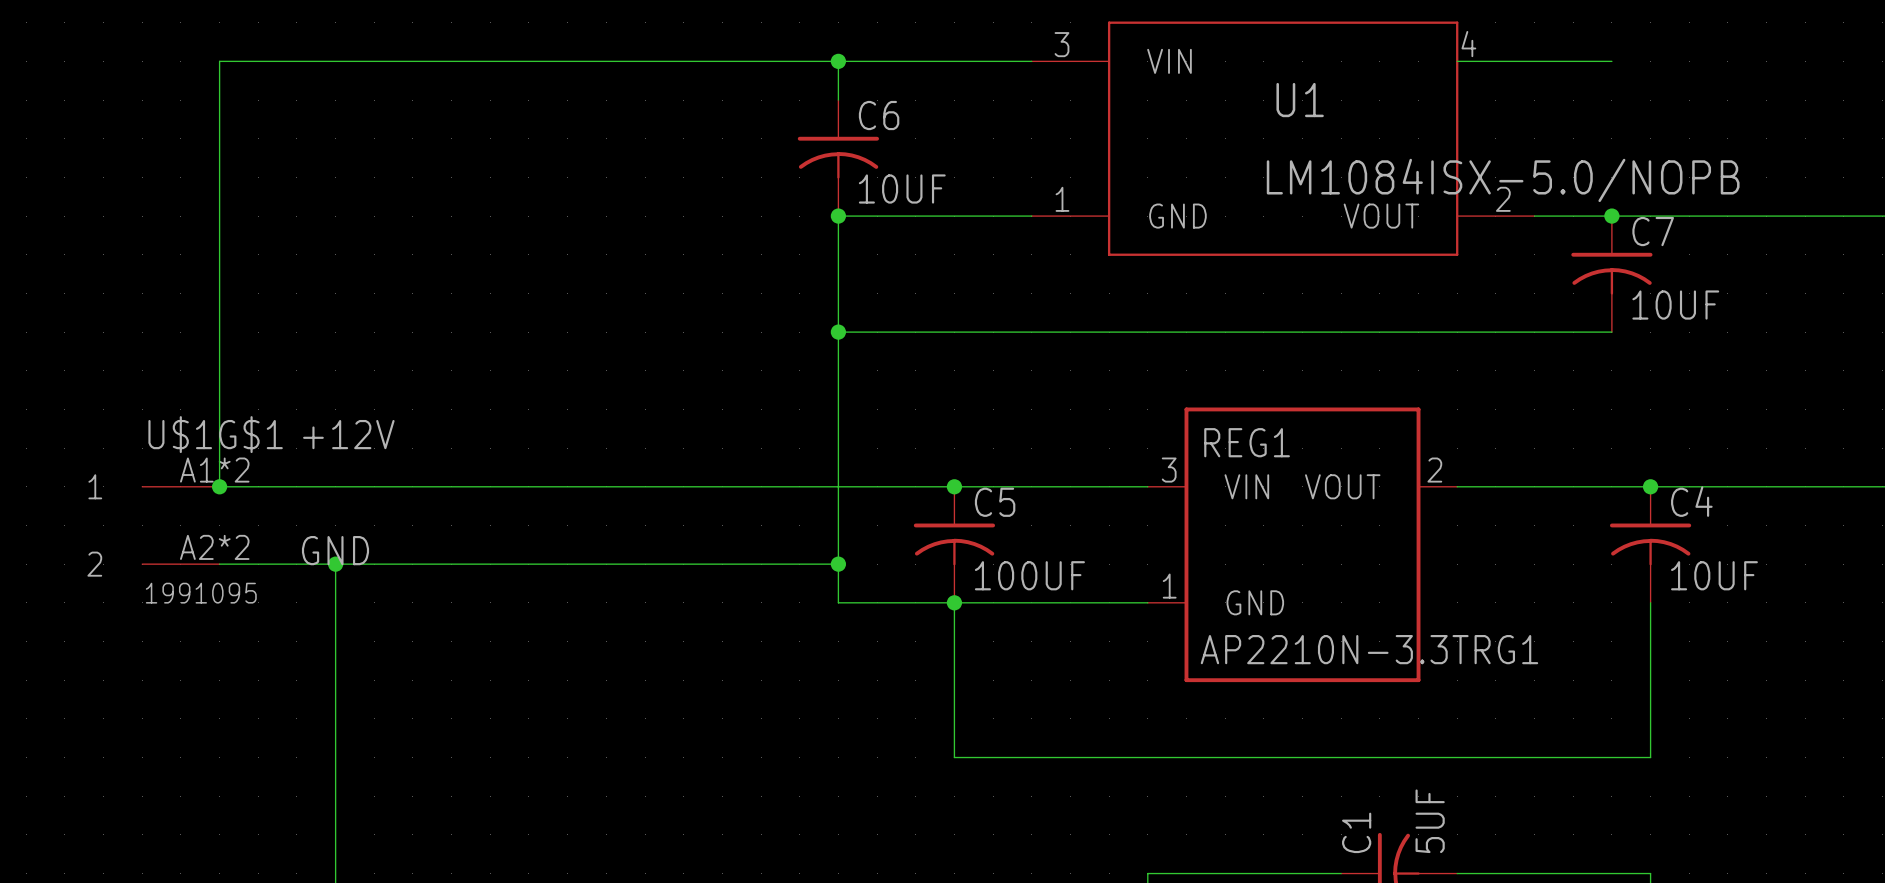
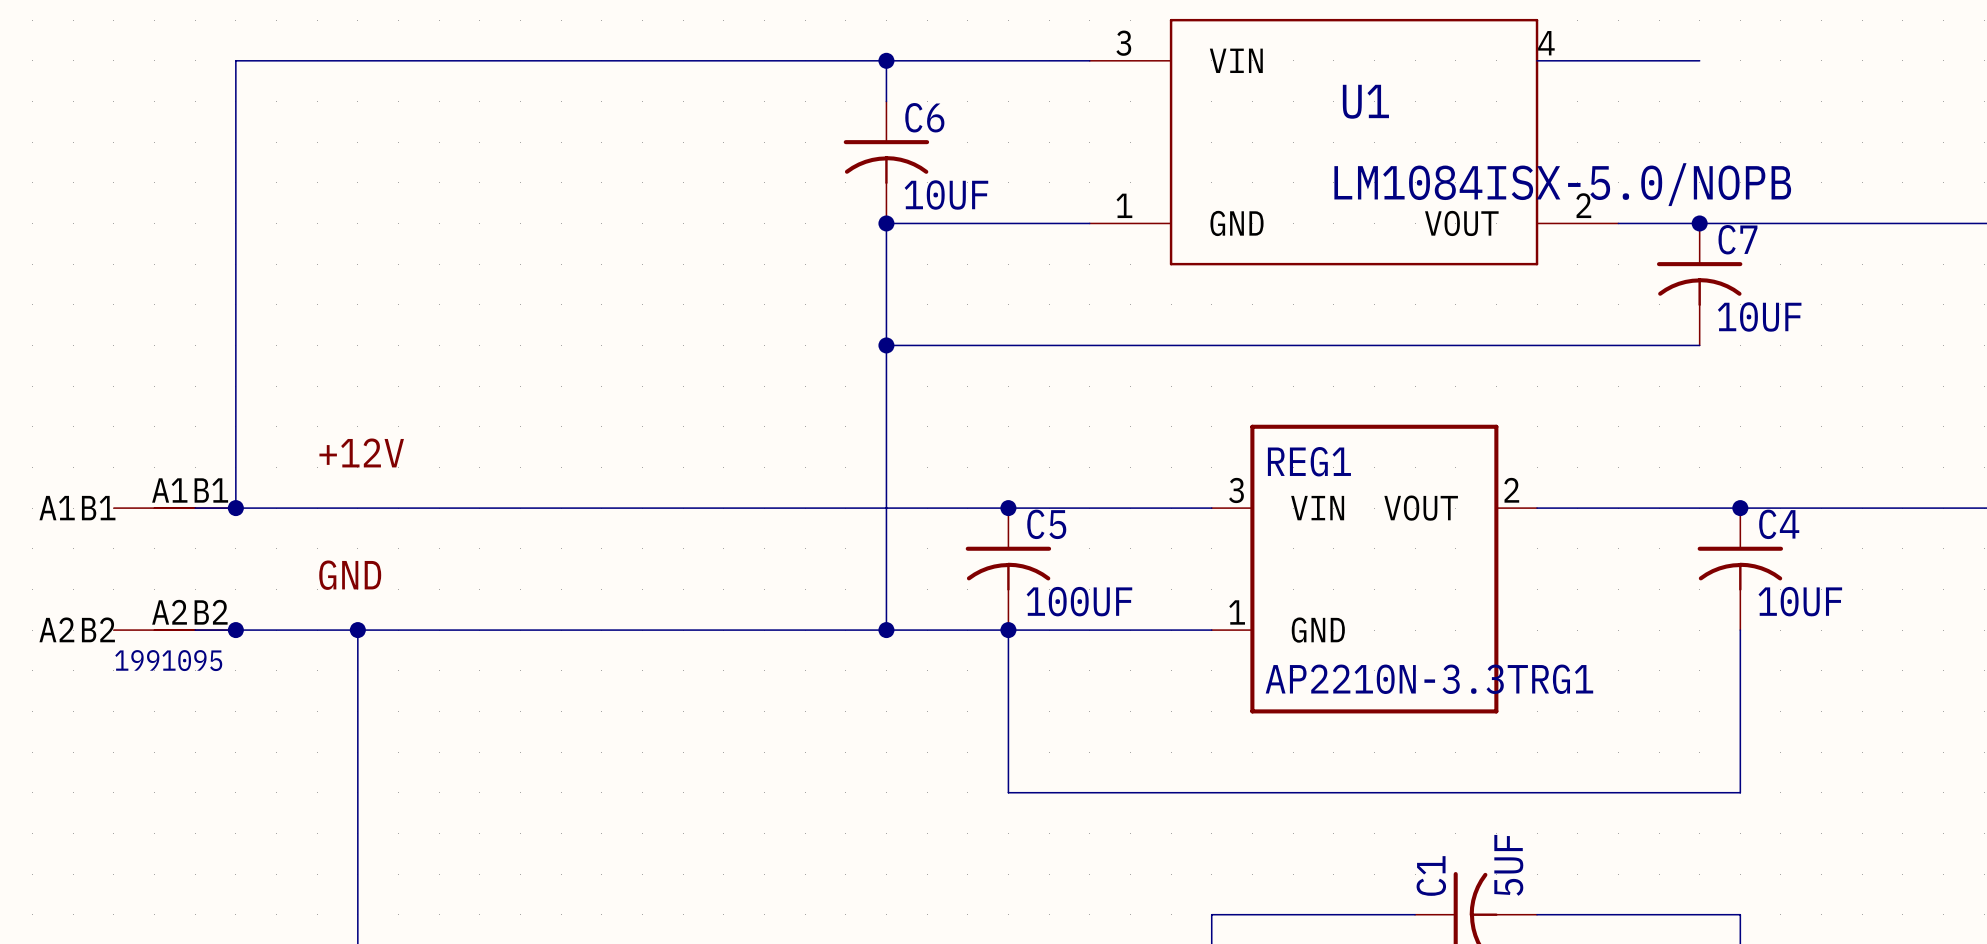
part: none -> (174, 508)
U$1G$1: (180, 486) -> none
part: 1991095 (180, 564) -> none
wire: (219, 564) (838, 564) -> none
wire: (335, 564) (335, 602) -> none
junction position: (335, 564) -> (357, 630)
junction position: (838, 564) -> (886, 630)
part: none -> 1991095 (174, 630)
wire: none -> (195, 630) (886, 630)
junction: none -> (235, 630)

